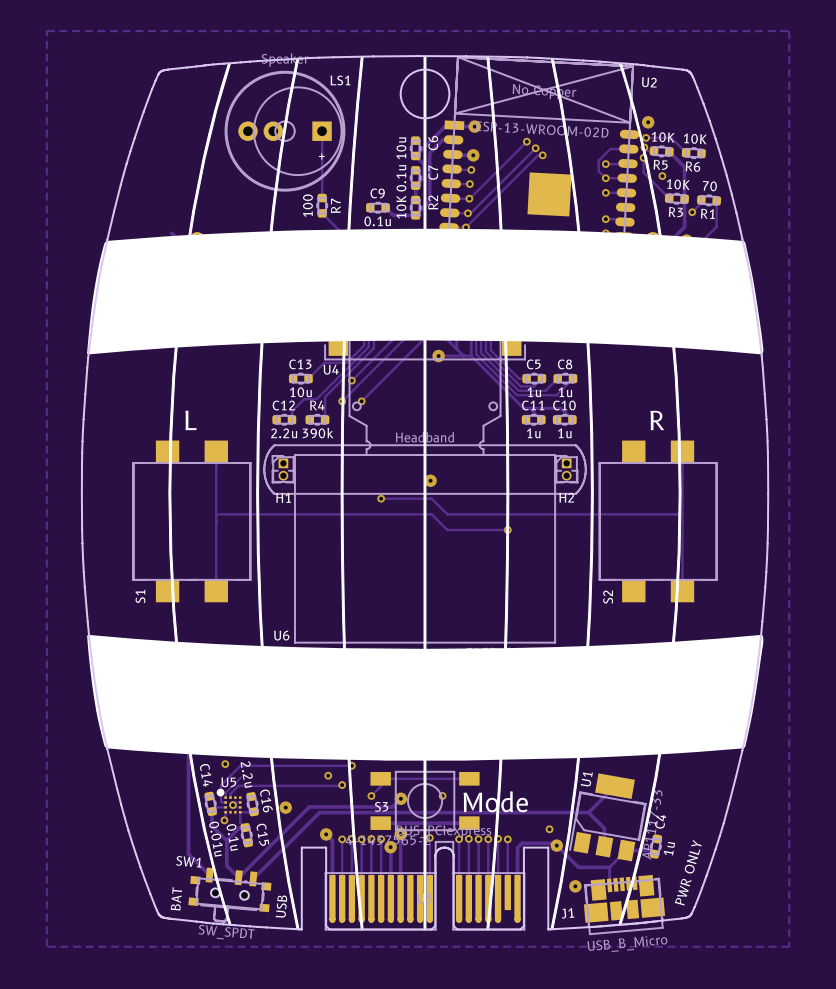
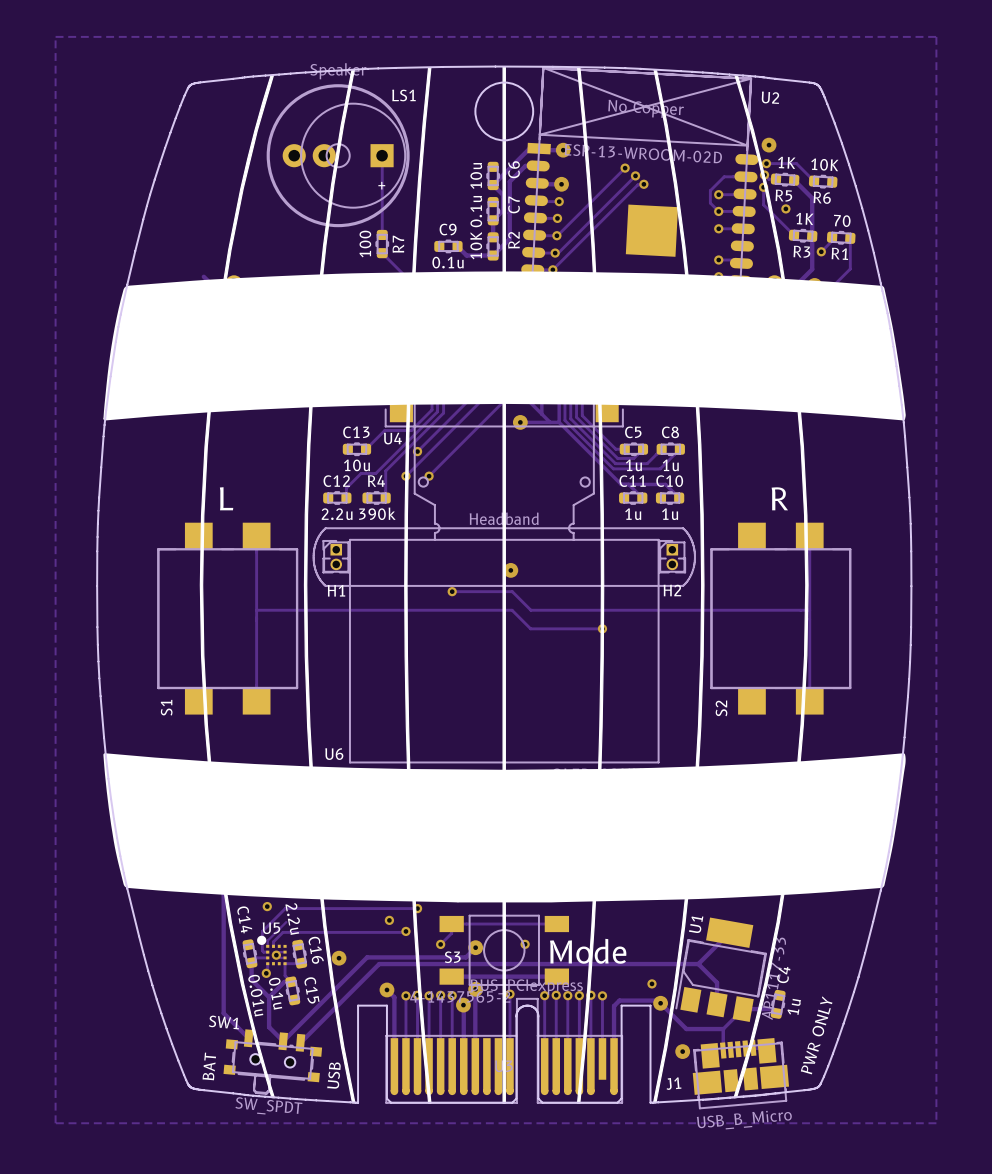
R5 value: 10K (663, 137) -> 1K (786, 162)
R3 value: 10K (678, 184) -> 1K (804, 218)

